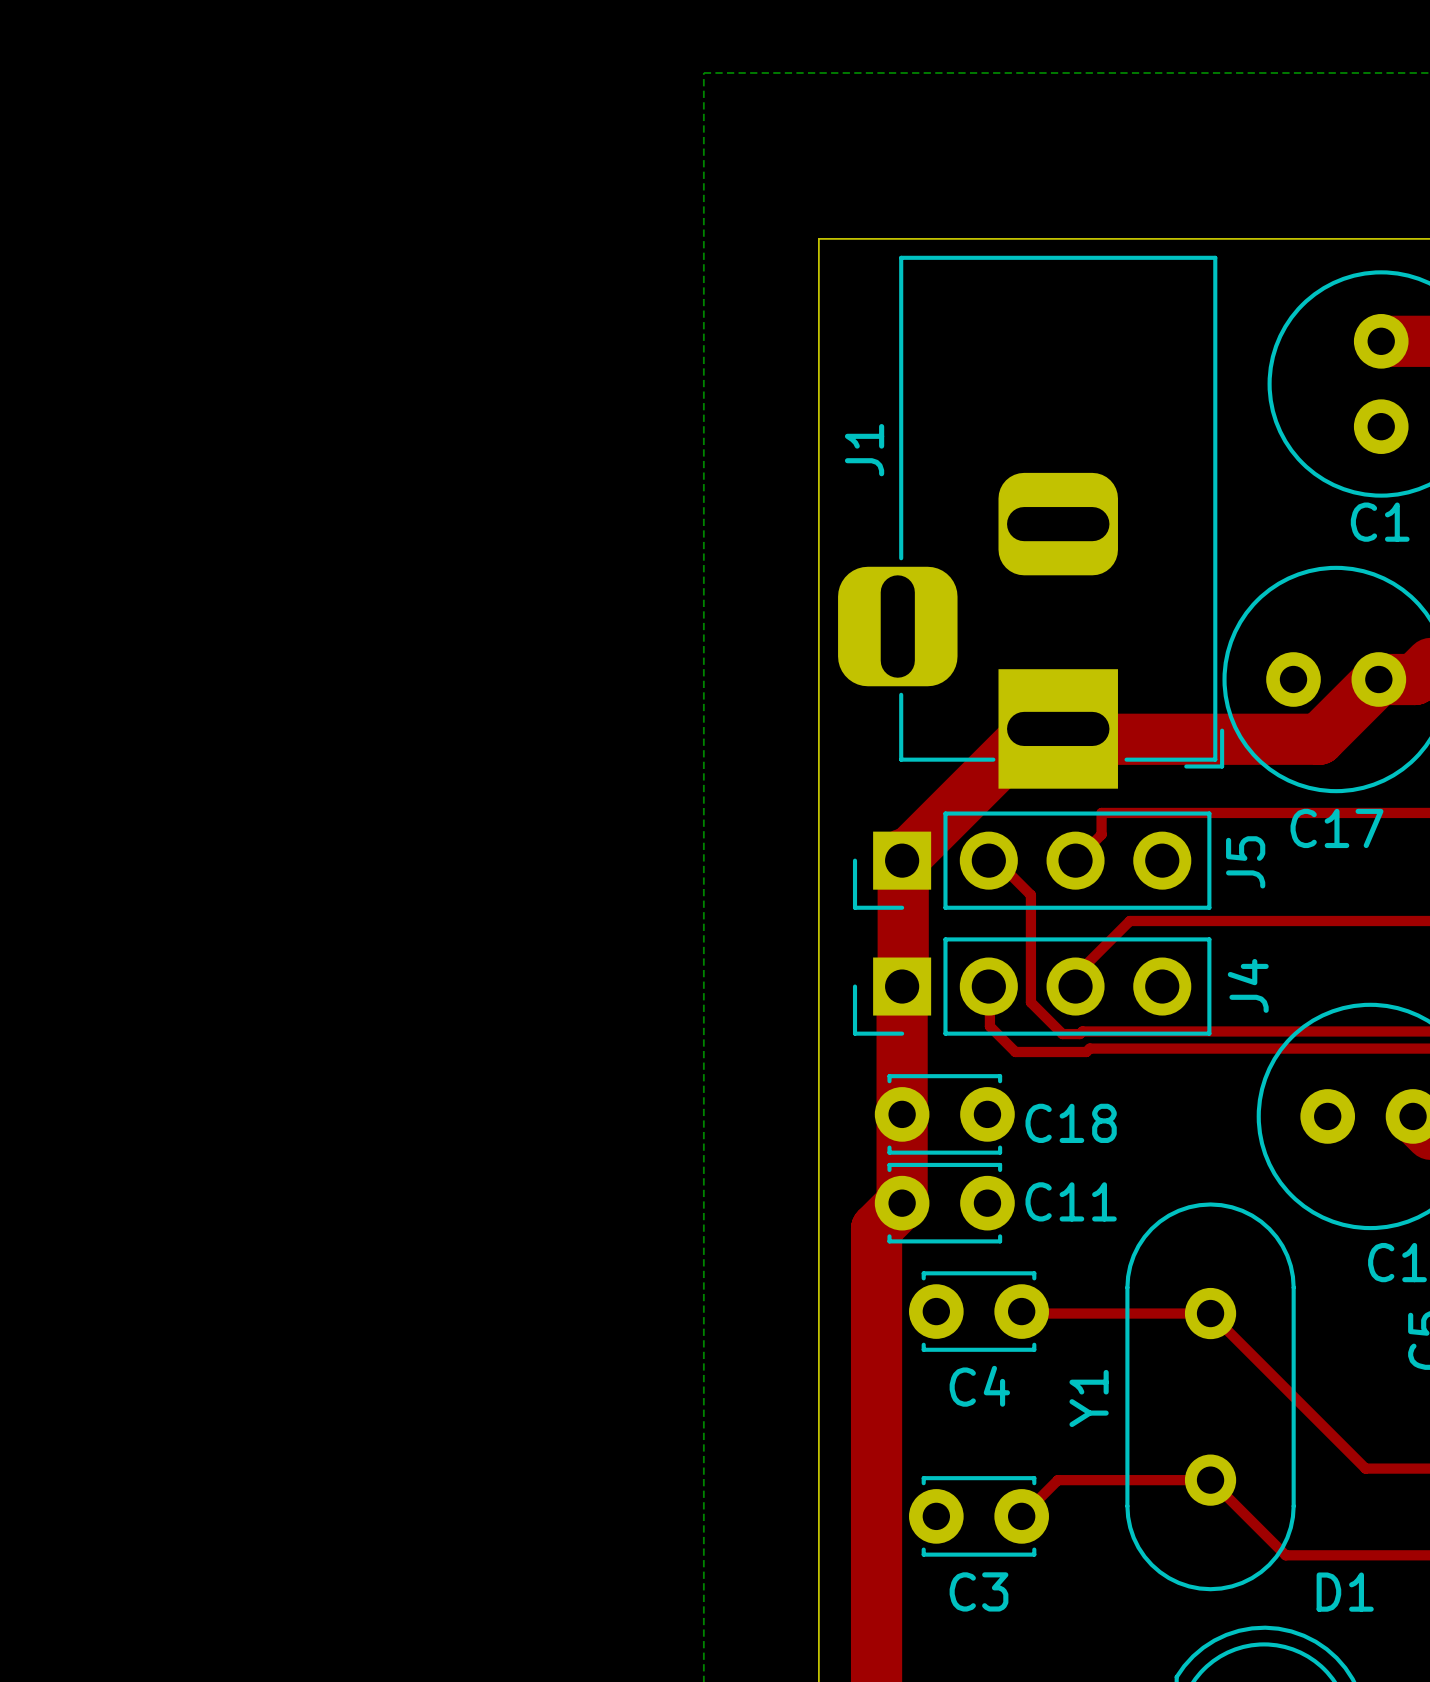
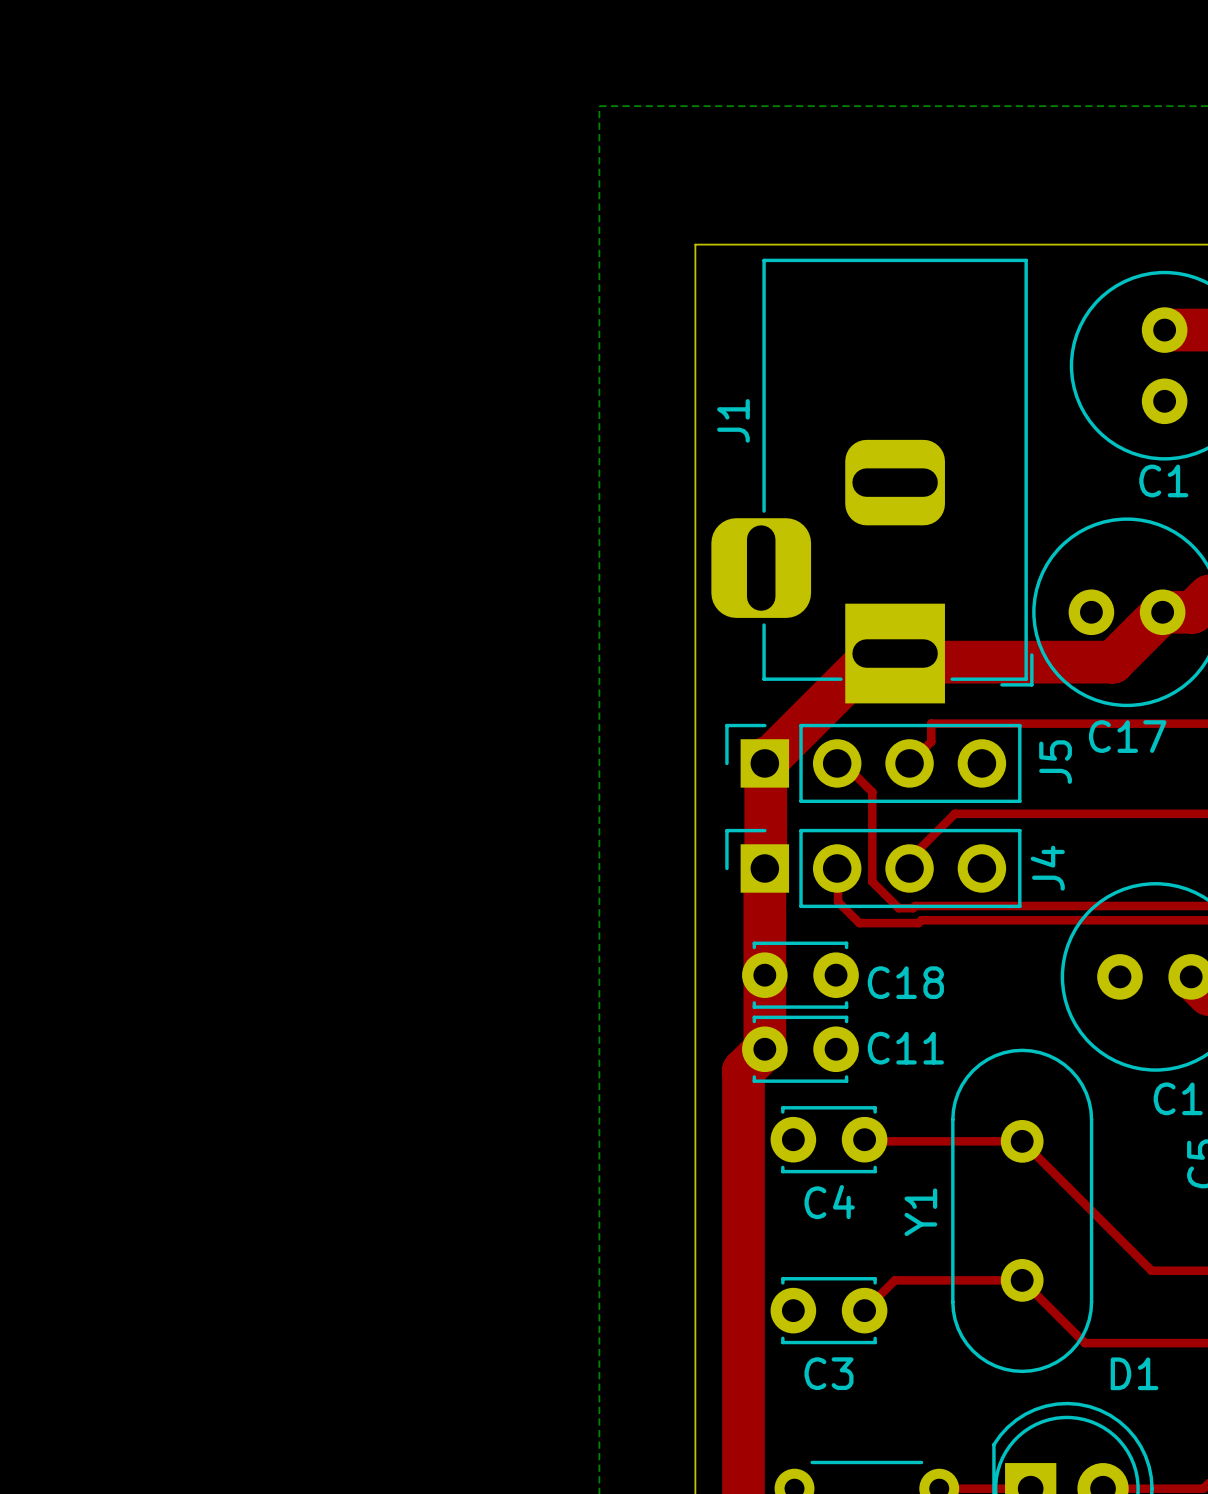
J5 footprint: [852, 811, 1212, 910] -> [725, 723, 1022, 804]
J4 footprint: [852, 937, 1212, 1036] -> [725, 828, 1022, 909]

